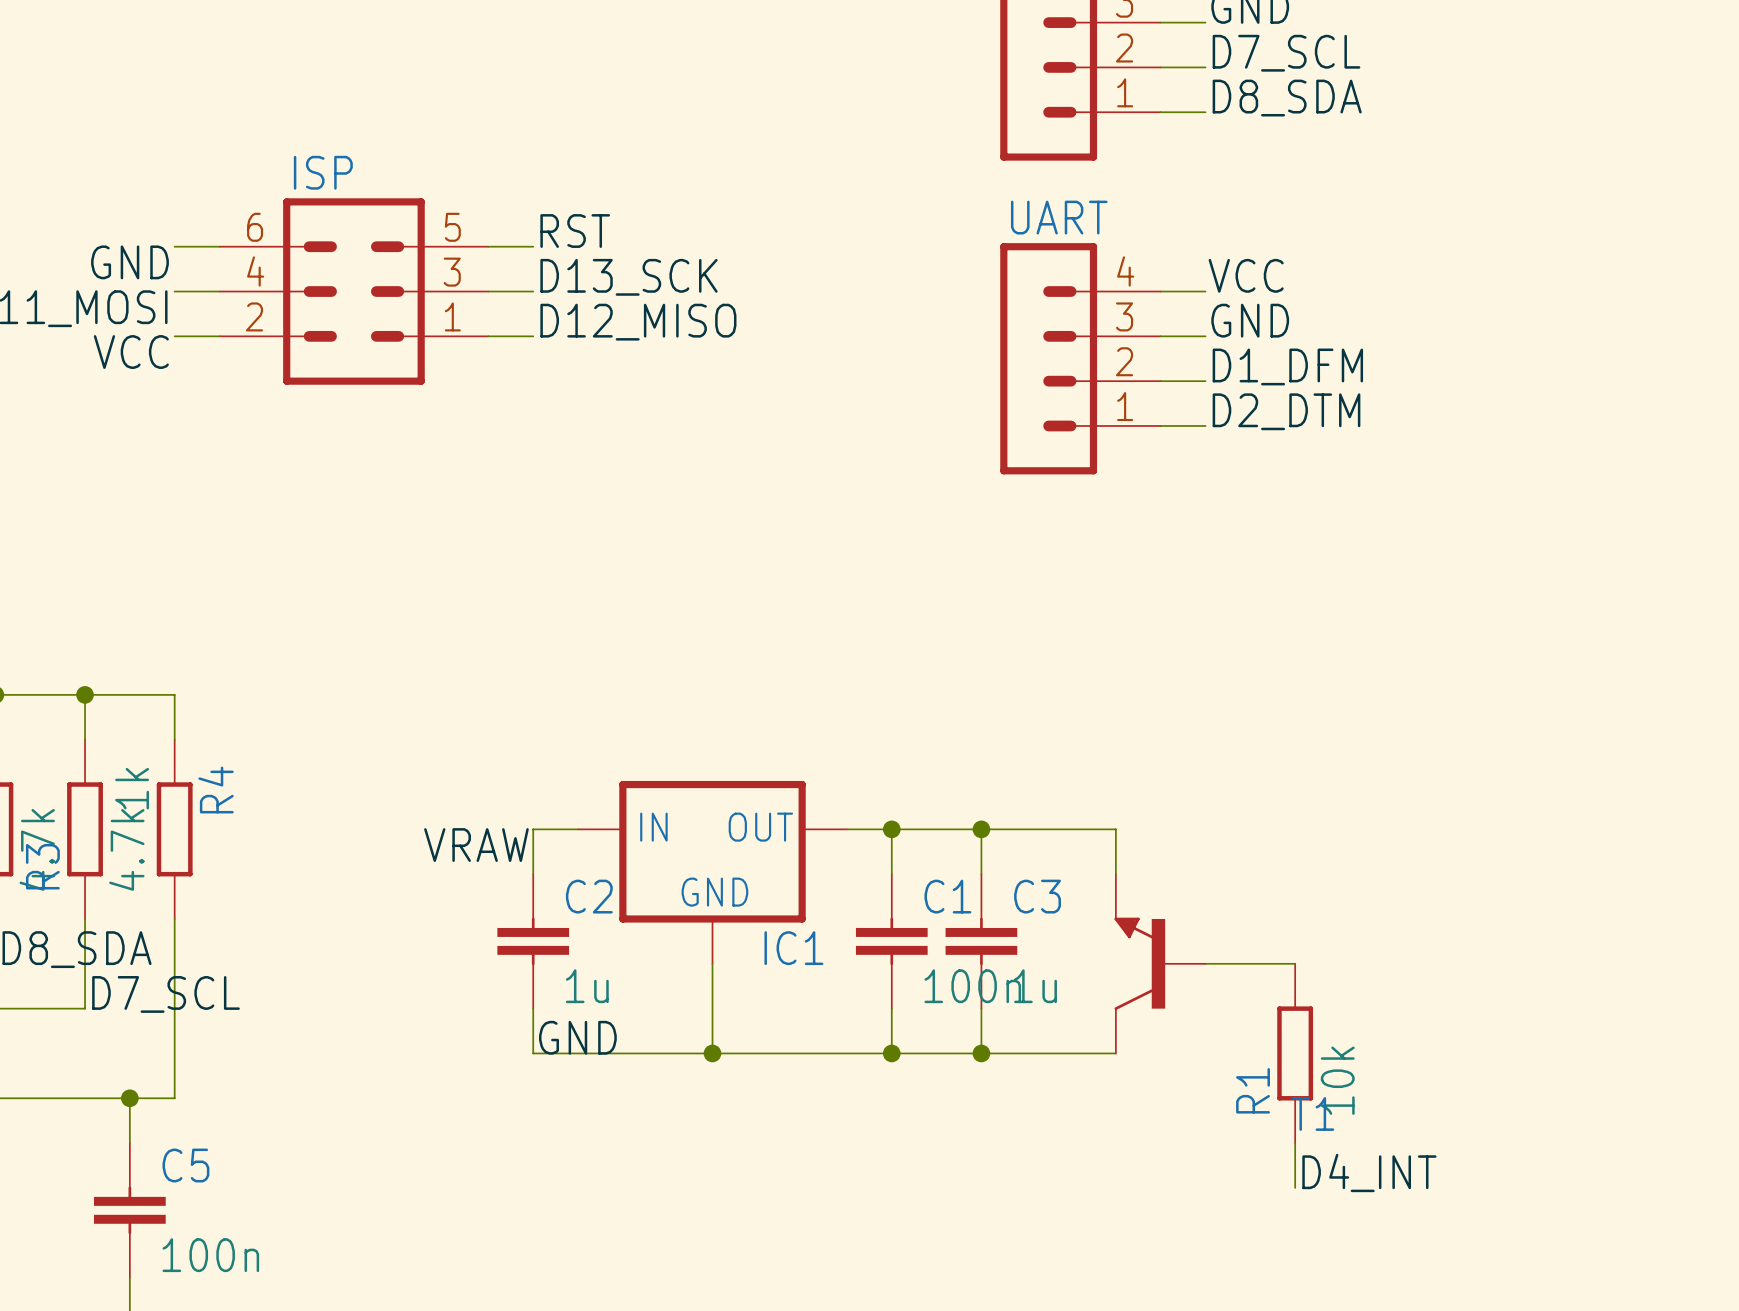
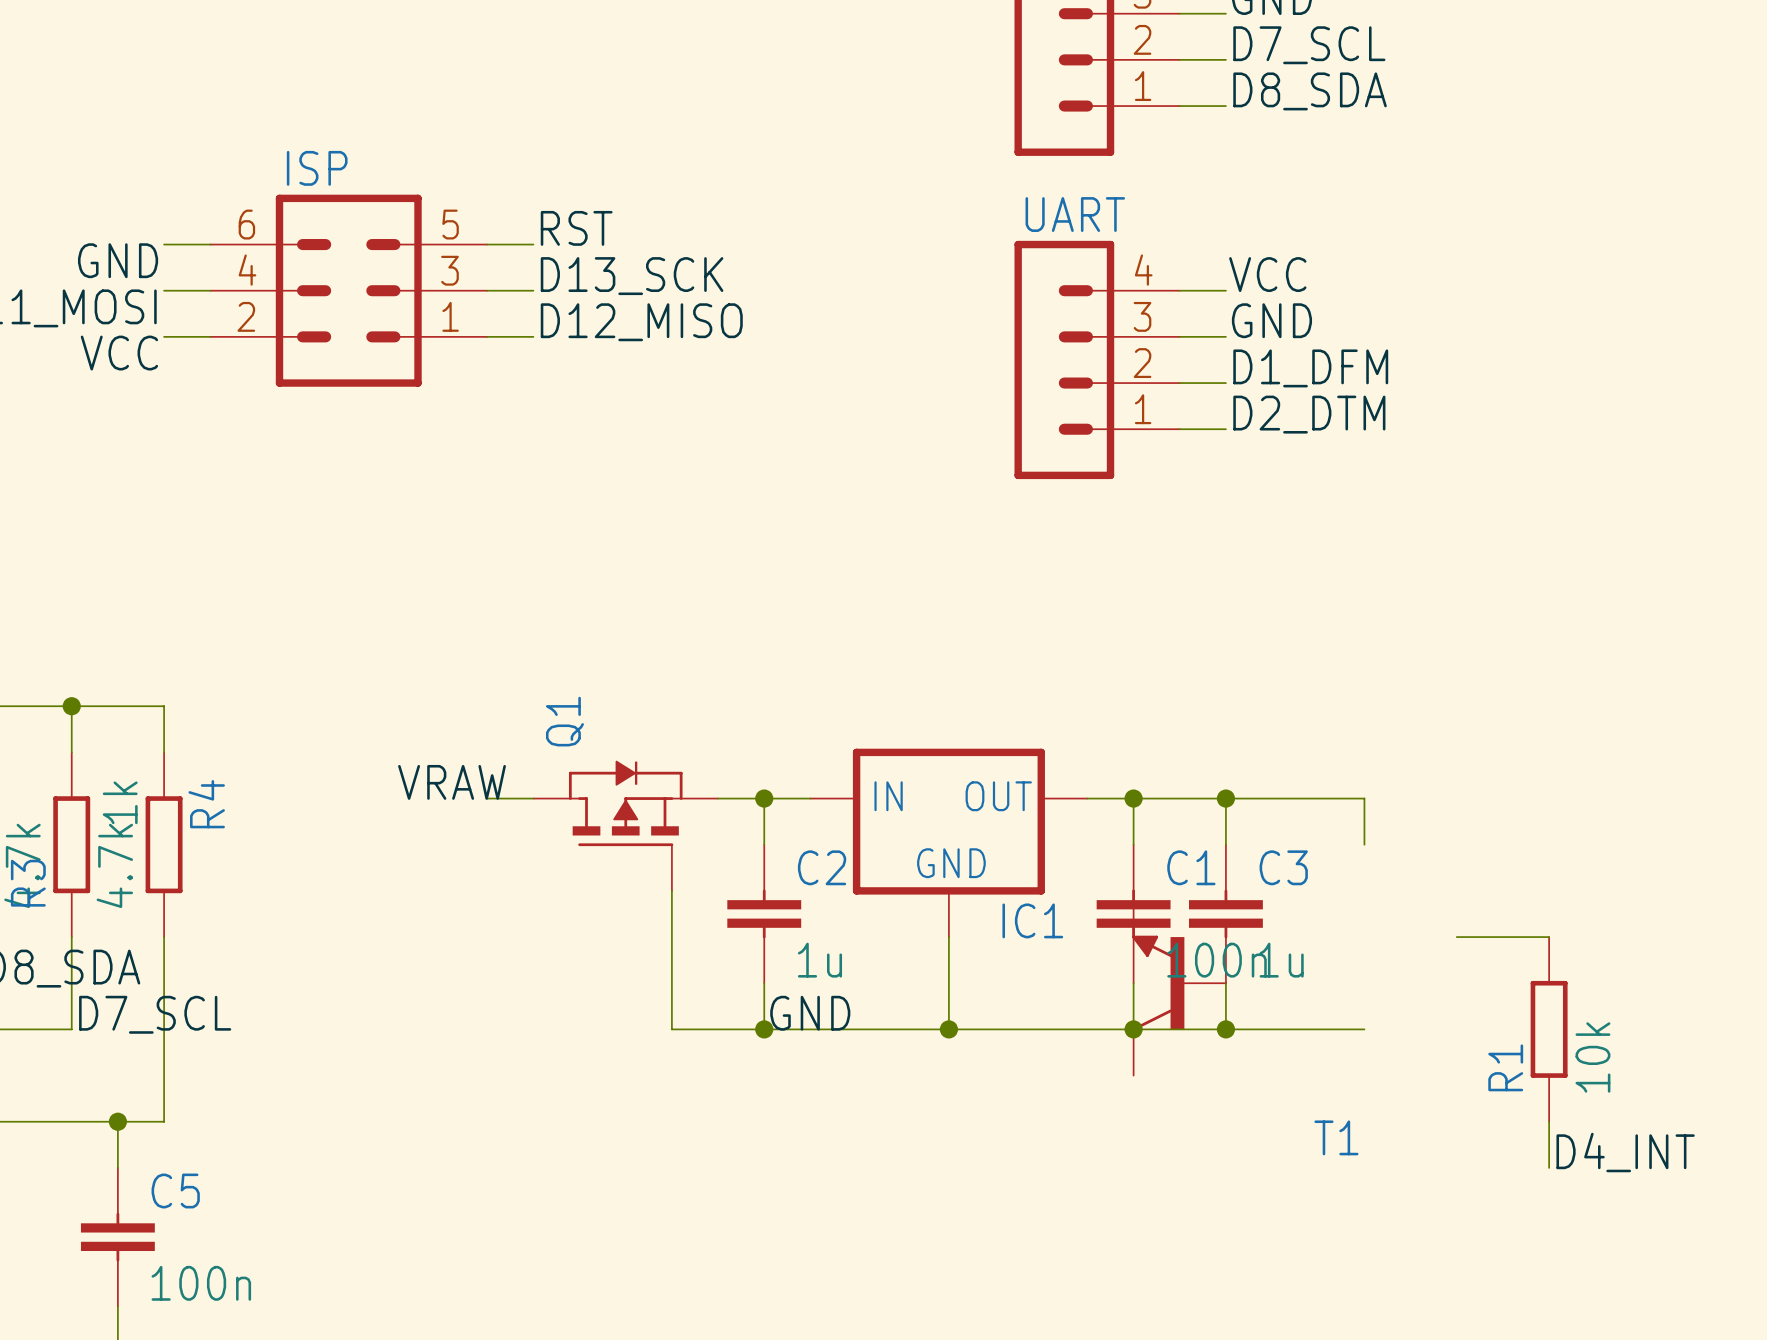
wire: none -> (487, 798) (533, 798)
wire: none -> (764, 798) (764, 844)
junction: none -> (764, 798)
junction: none -> (1133, 798)
junction: none -> (1225, 798)
Q1: none -> (625, 825)
wire: (578, 829) (533, 829) (533, 874) -> none
wire: (846, 829) (1115, 829) (1115, 874) -> (1087, 798) (1364, 798) (1364, 844)
wire: (891, 829) (891, 874) -> (1133, 798) (1133, 844)
junction: (891, 829) -> none
wire: (981, 829) (981, 874) -> (1225, 798) (1225, 844)
junction: (981, 829) -> none
label position: VRAW (476, 845) -> VRAW (452, 782)
IC1 position: (712, 872) -> (948, 842)
wire: none -> (671, 890) (671, 1029) (1364, 1029)
wire: none -> (1456, 937) (1549, 937)
C2 position: (533, 941) -> (764, 913)
C1 position: (891, 941) -> (1133, 913)
C3 position: (981, 941) -> (1225, 913)
wire: (712, 963) (712, 1053) -> (948, 937) (948, 1029)
wire: (1205, 963) (1295, 963) -> (1225, 983) (1225, 1029)
wire: (533, 1008) (533, 1053) (1115, 1053) -> none
wire: (891, 1008) (891, 1053) -> (1133, 983) (1133, 1029)
junction: none -> (948, 1029)
wire: (981, 1008) (981, 1053) -> (764, 983) (764, 1029)
junction: none -> (1133, 1029)
junction: none -> (1225, 1029)
label position: GND (577, 1037) -> GND (810, 1013)
junction position: (712, 1053) -> (764, 1029)
junction: (891, 1053) -> none
junction: (981, 1053) -> none
R1 position: (1295, 1053) -> (1549, 1029)
wire: (1295, 1143) (1295, 1187) -> (1549, 1121) (1549, 1167)
label position: D4_INT (1369, 1172) -> D4_INT (1625, 1152)

